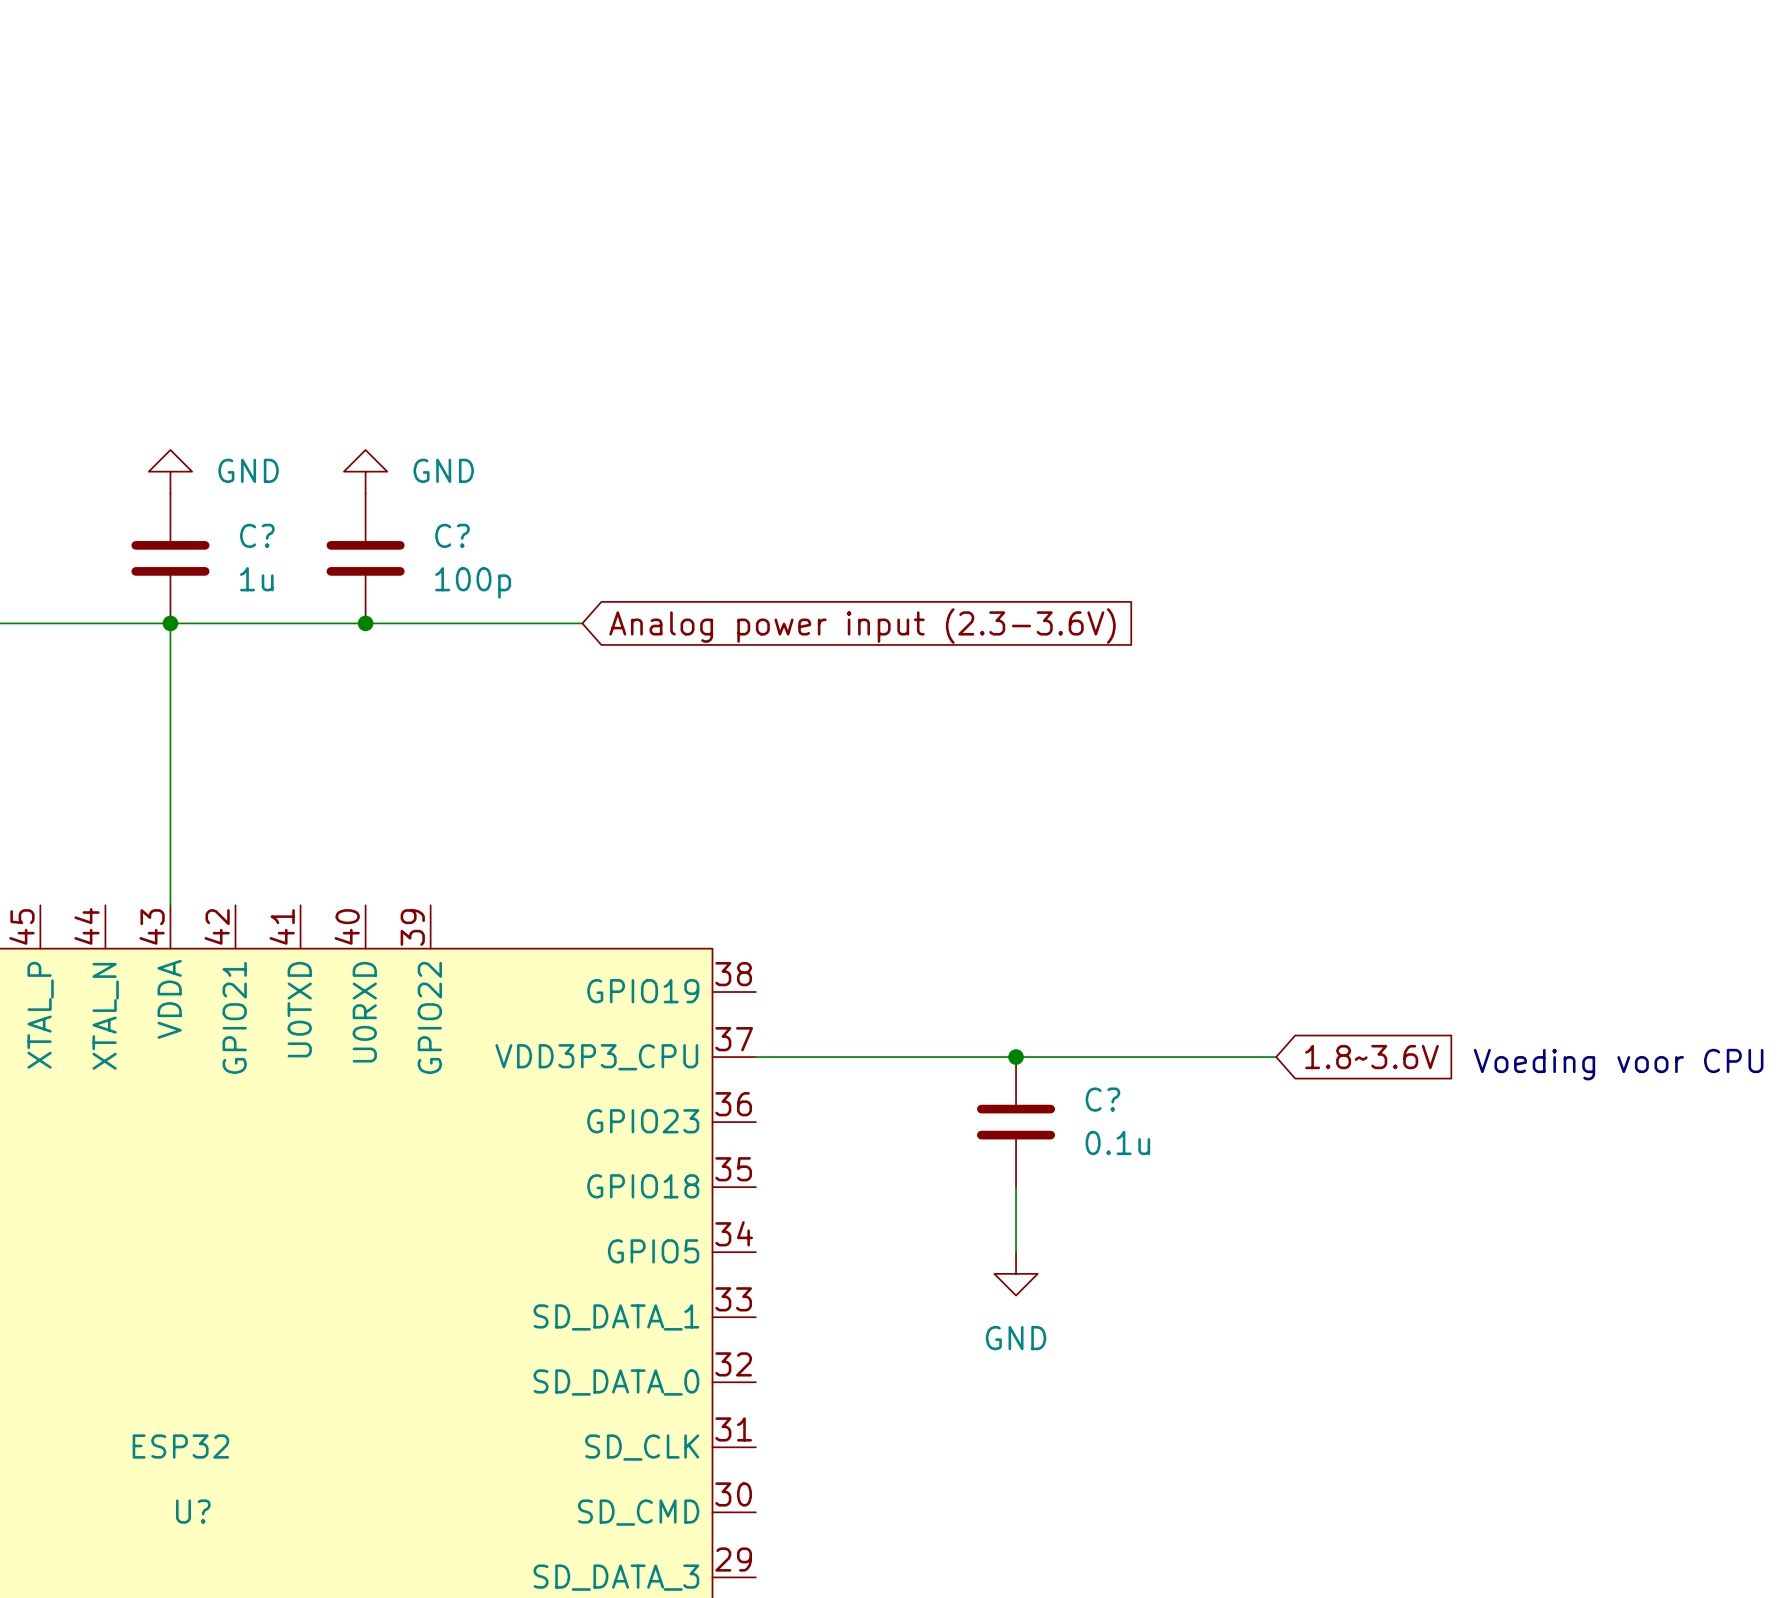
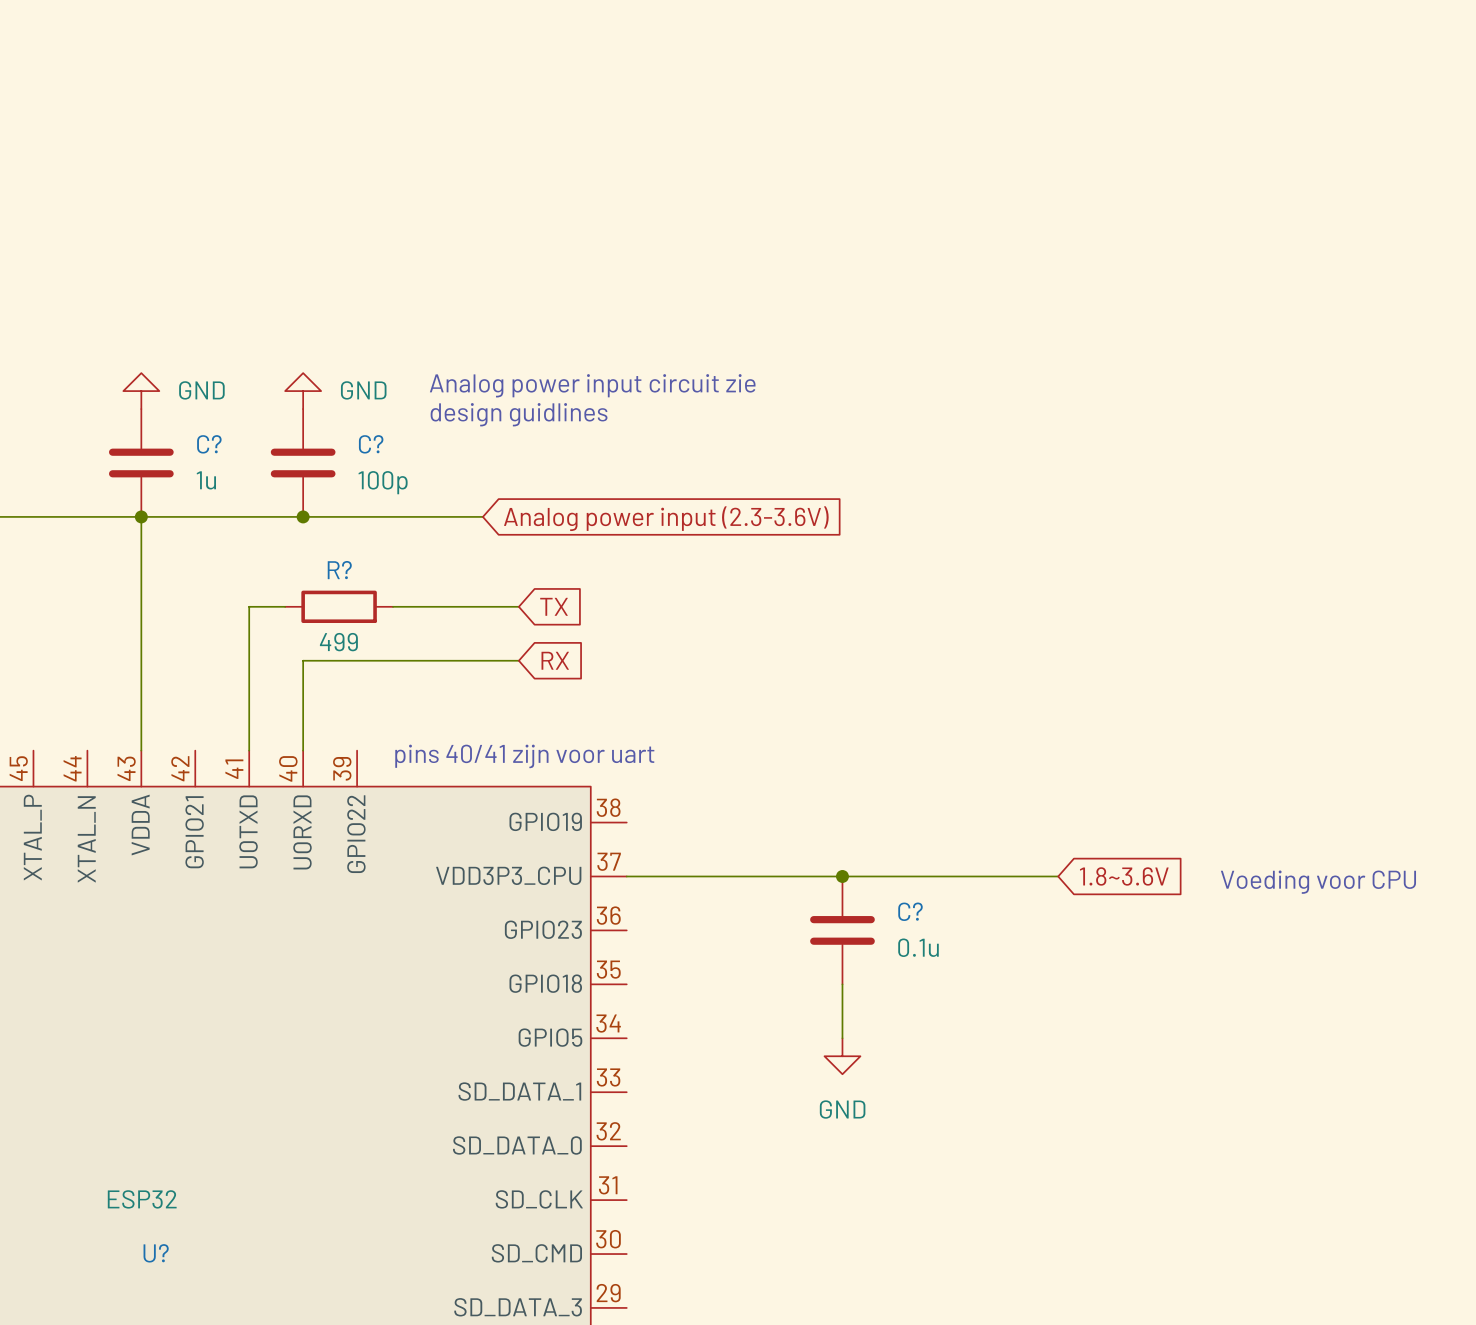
text: none -> Analog power input circuit zie (592, 385)
text: none -> design guidlines (519, 414)
wire: none -> (285, 606) (249, 606) (249, 750)
R?: none -> 499 (339, 606)
wire: none -> (393, 606) (518, 606)
global label: none -> TX (554, 606)
wire: none -> (518, 660) (303, 660) (303, 750)
global label: none -> RX (555, 660)
text: none -> pins 40/41 zijn voor uart (524, 756)

